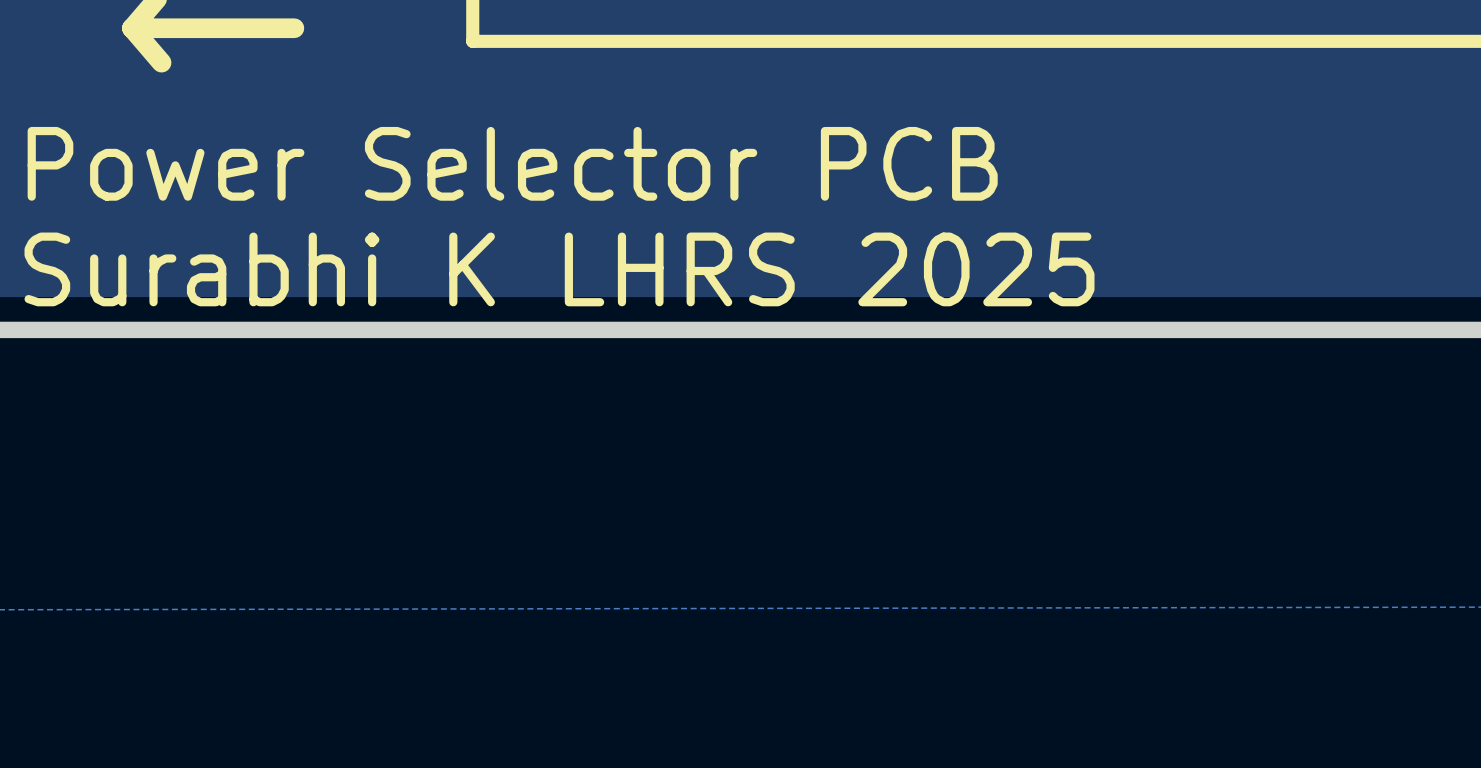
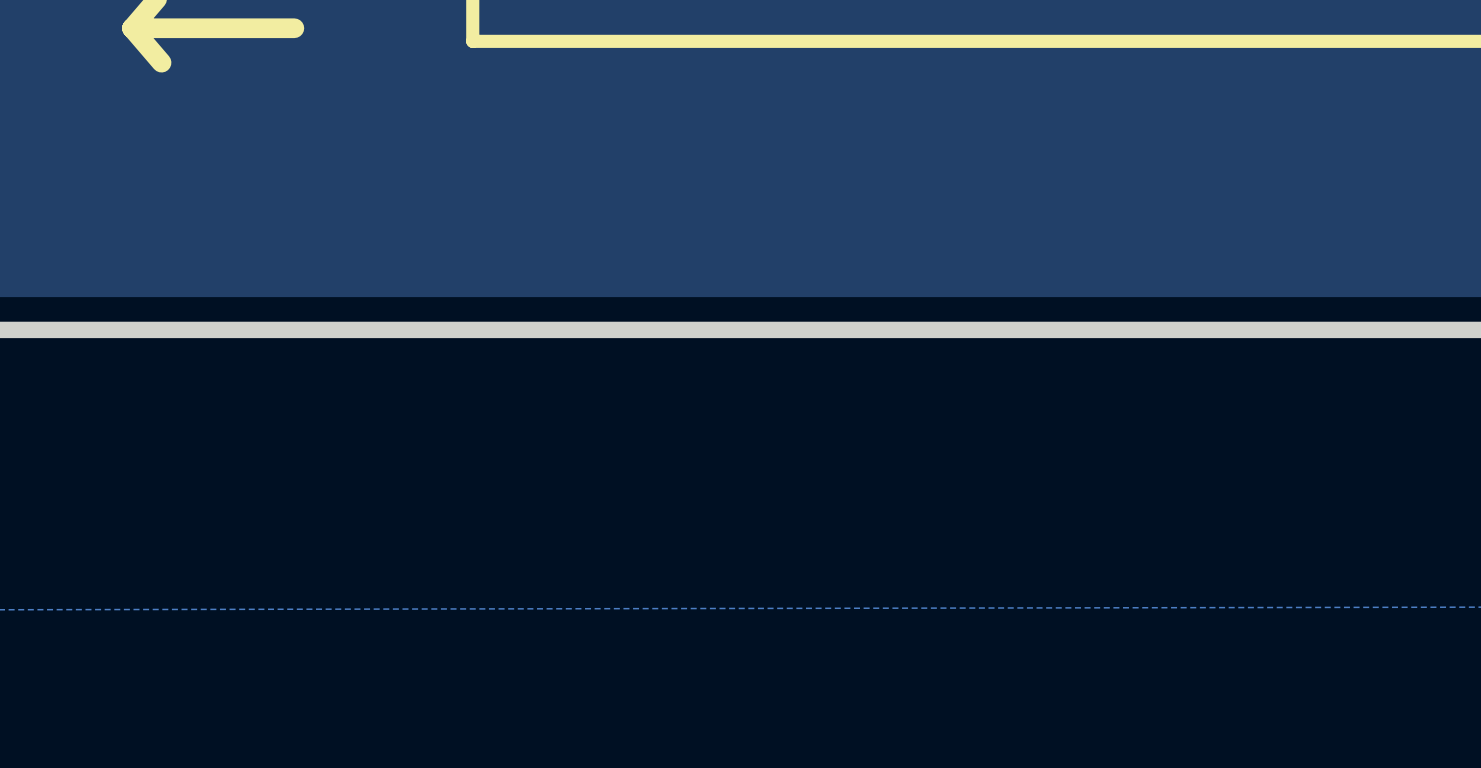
text: Power Selector PCB (512, 163) -> none
text: Surabhi K LHRS 2025 (559, 269) -> none

